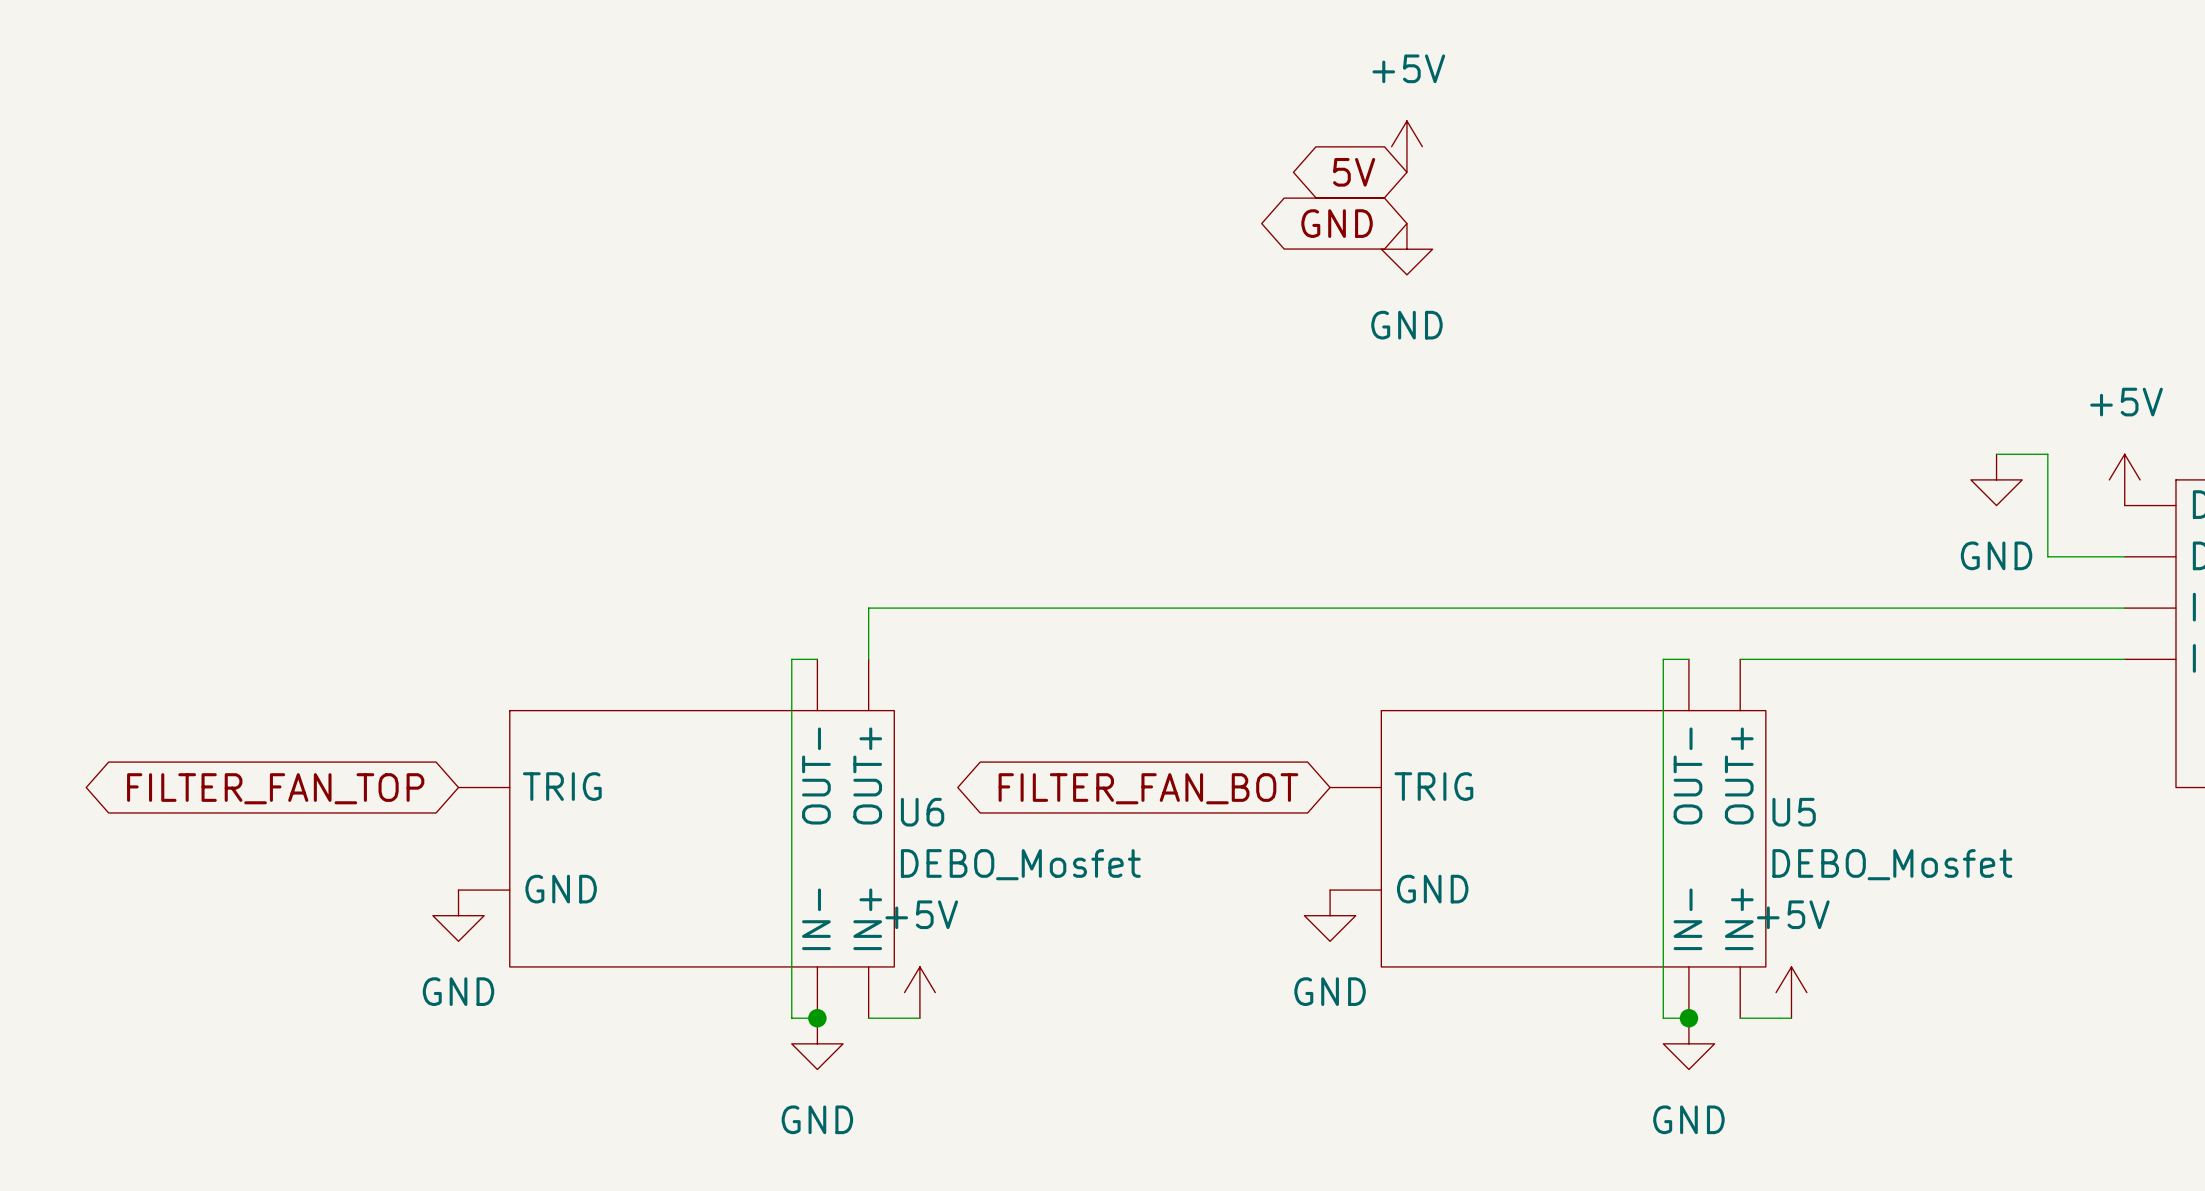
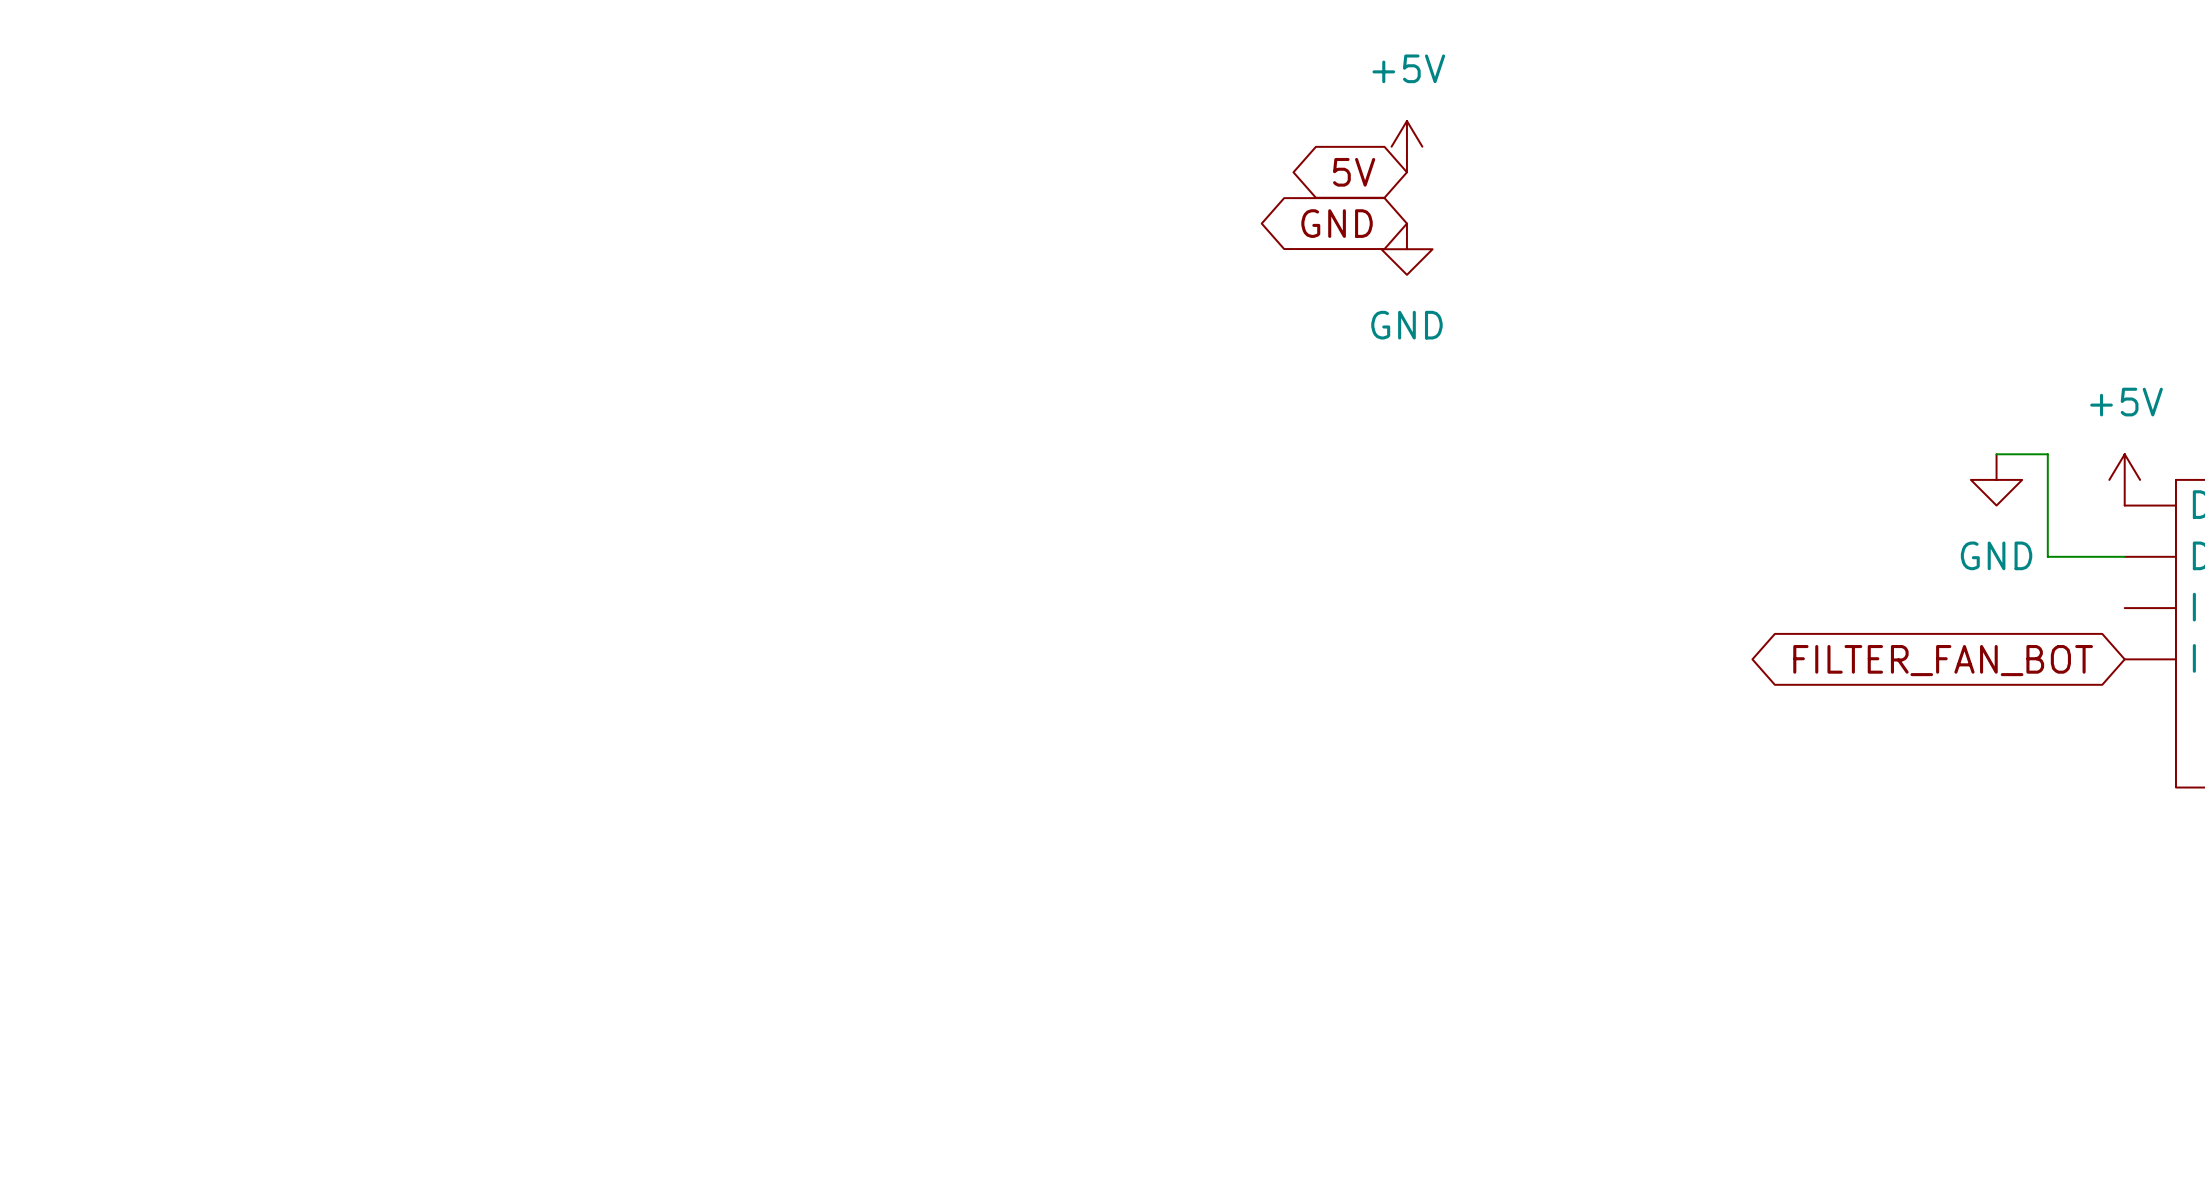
wire: (2124, 608) (868, 608) (868, 659) -> none
wire: (817, 659) (791, 659) (791, 1018) (817, 1018) -> none
wire: (1688, 659) (1663, 659) (1663, 1018) (1688, 1018) -> none
wire: (1740, 659) (2124, 659) -> none
global label: none -> FILTER_FAN_BOT (1943, 660)
global label: FILTER_FAN_TOP (275, 788) -> none
global label: FILTER_FAN_BOT (1148, 788) -> none
U6: DEBO_Mosfet (676, 838) -> none
U5: DEBO_Mosfet (1547, 838) -> none
power symbol: GND (458, 915) -> none
power symbol: GND (1330, 915) -> none
power symbol: +5V (919, 992) -> none
power symbol: +5V (1791, 992) -> none
junction: (817, 1018) -> none
wire: (868, 1018) (919, 1018) -> none
junction: (1688, 1018) -> none
wire: (1740, 1018) (1791, 1018) -> none
power symbol: GND (817, 1043) -> none
power symbol: GND (1688, 1043) -> none

